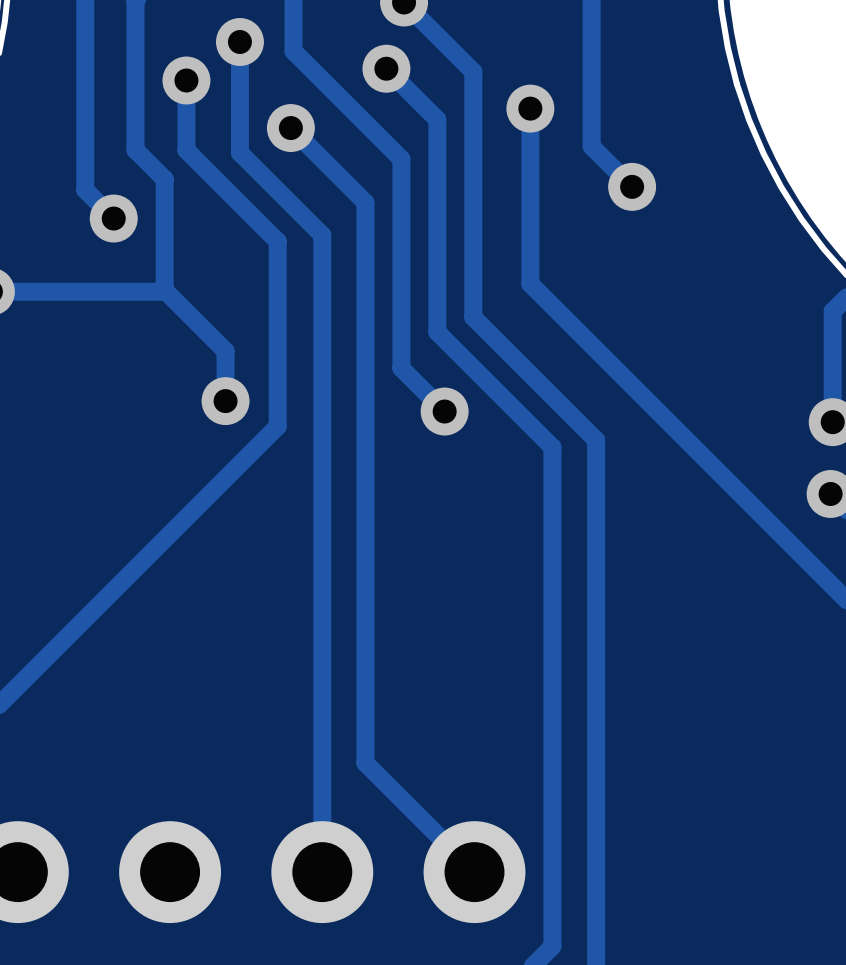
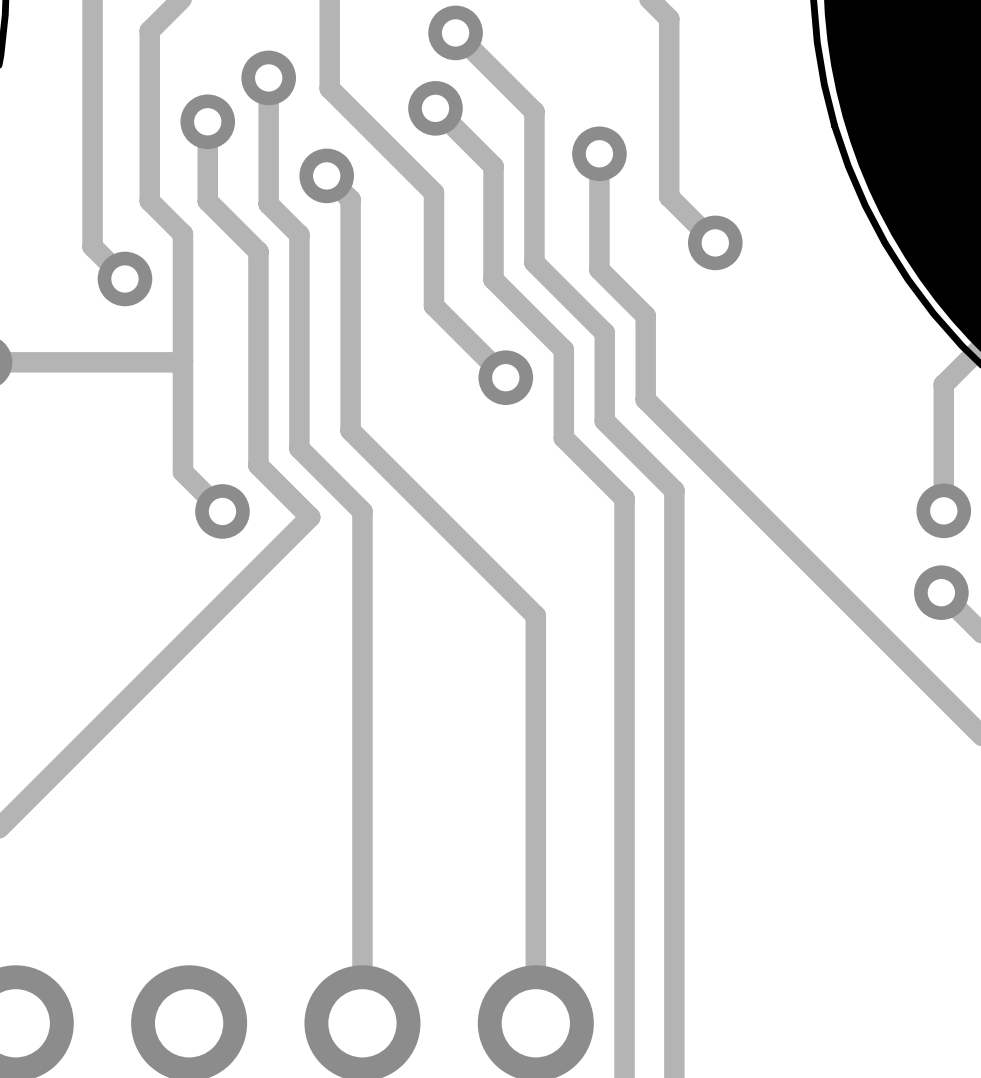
track: (385, 142) (401, 159) (401, 368) (444, 411) -> (433, 192) (433, 305) (505, 377)
track: (311, 149) (365, 202) (365, 763) (474, 872) -> (350, 199) (350, 430) (535, 615) (535, 1023)
track: (266, 179) (322, 235) (322, 422) -> (299, 234) (299, 448) (362, 511)
track: (230, 194) (277, 241) (276, 427) -> (258, 251) (258, 465) (310, 517)
track: (473, 204) (473, 317) (596, 440) -> (534, 262) (604, 332) (604, 421) (674, 490) (674, 531)
track: (530, 210) (530, 283) (570, 324) -> (599, 269) (645, 315) (645, 399)
track: (437, 219) (437, 332) (552, 447) -> (493, 279) (563, 349) (563, 437) (624, 498) (624, 539)
track: (164, 290) (225, 351) (225, 401) -> (182, 360) (182, 471) (222, 511)
via position: (225, 401) -> (222, 511)
via position: (444, 411) -> (505, 377)

